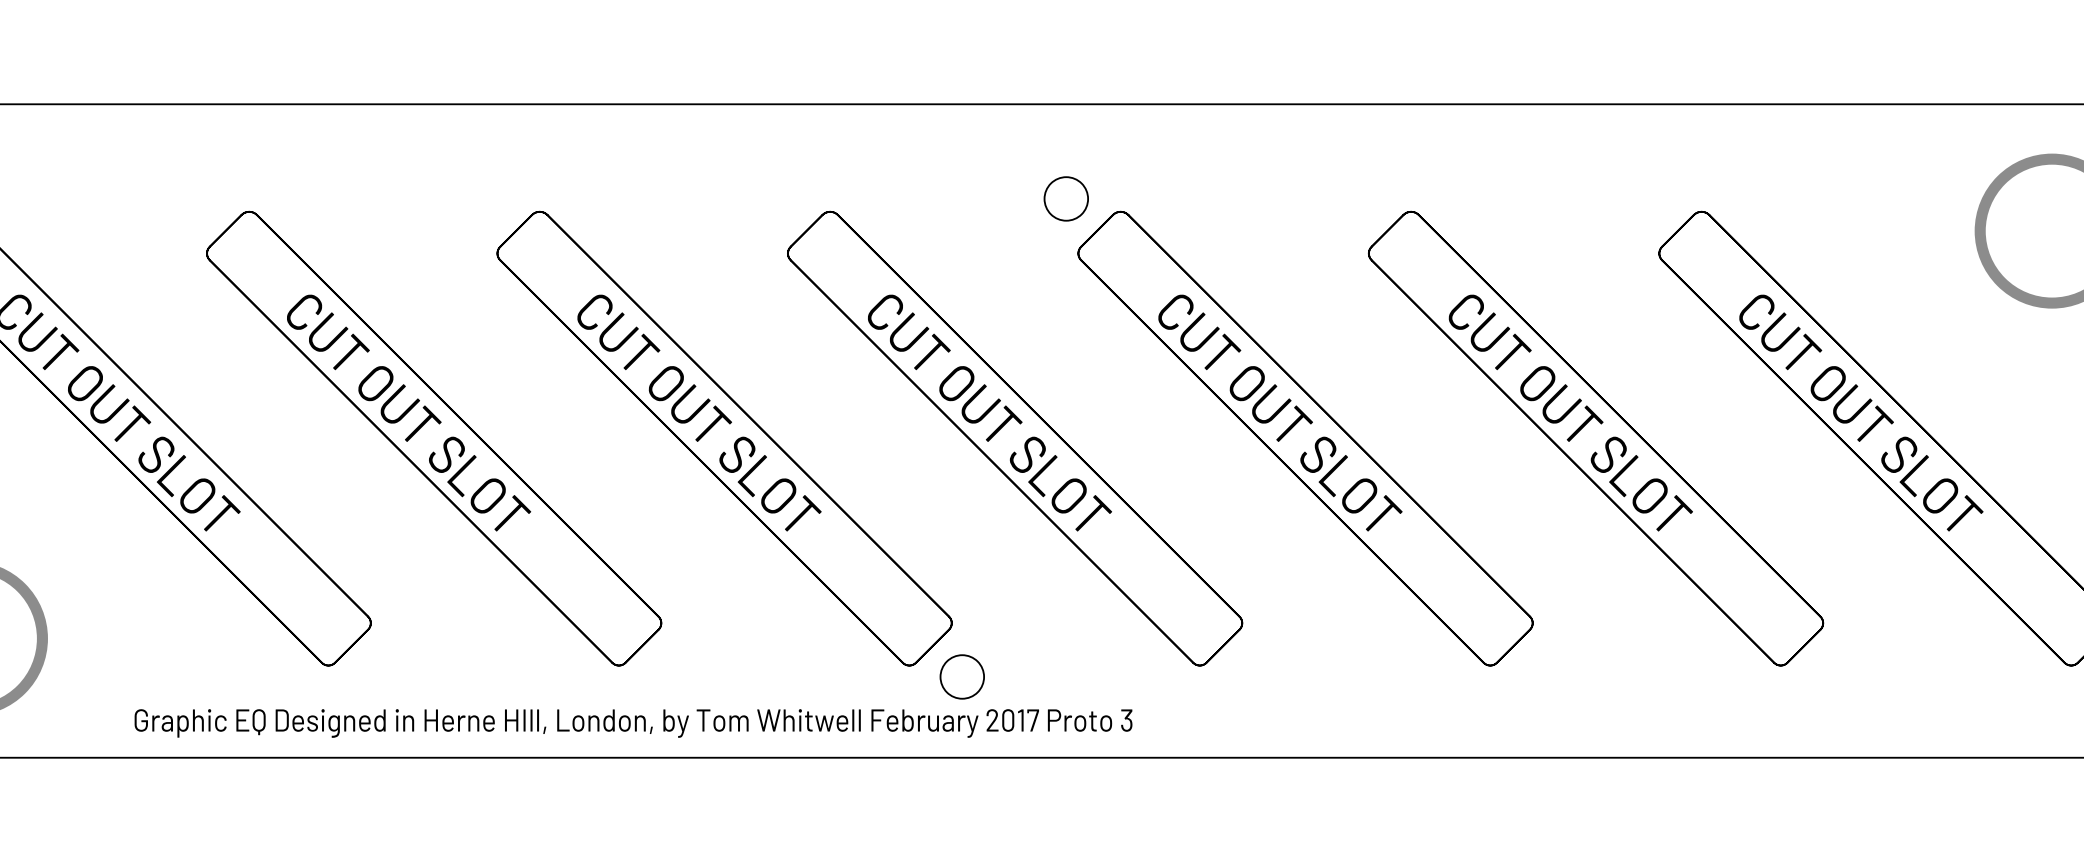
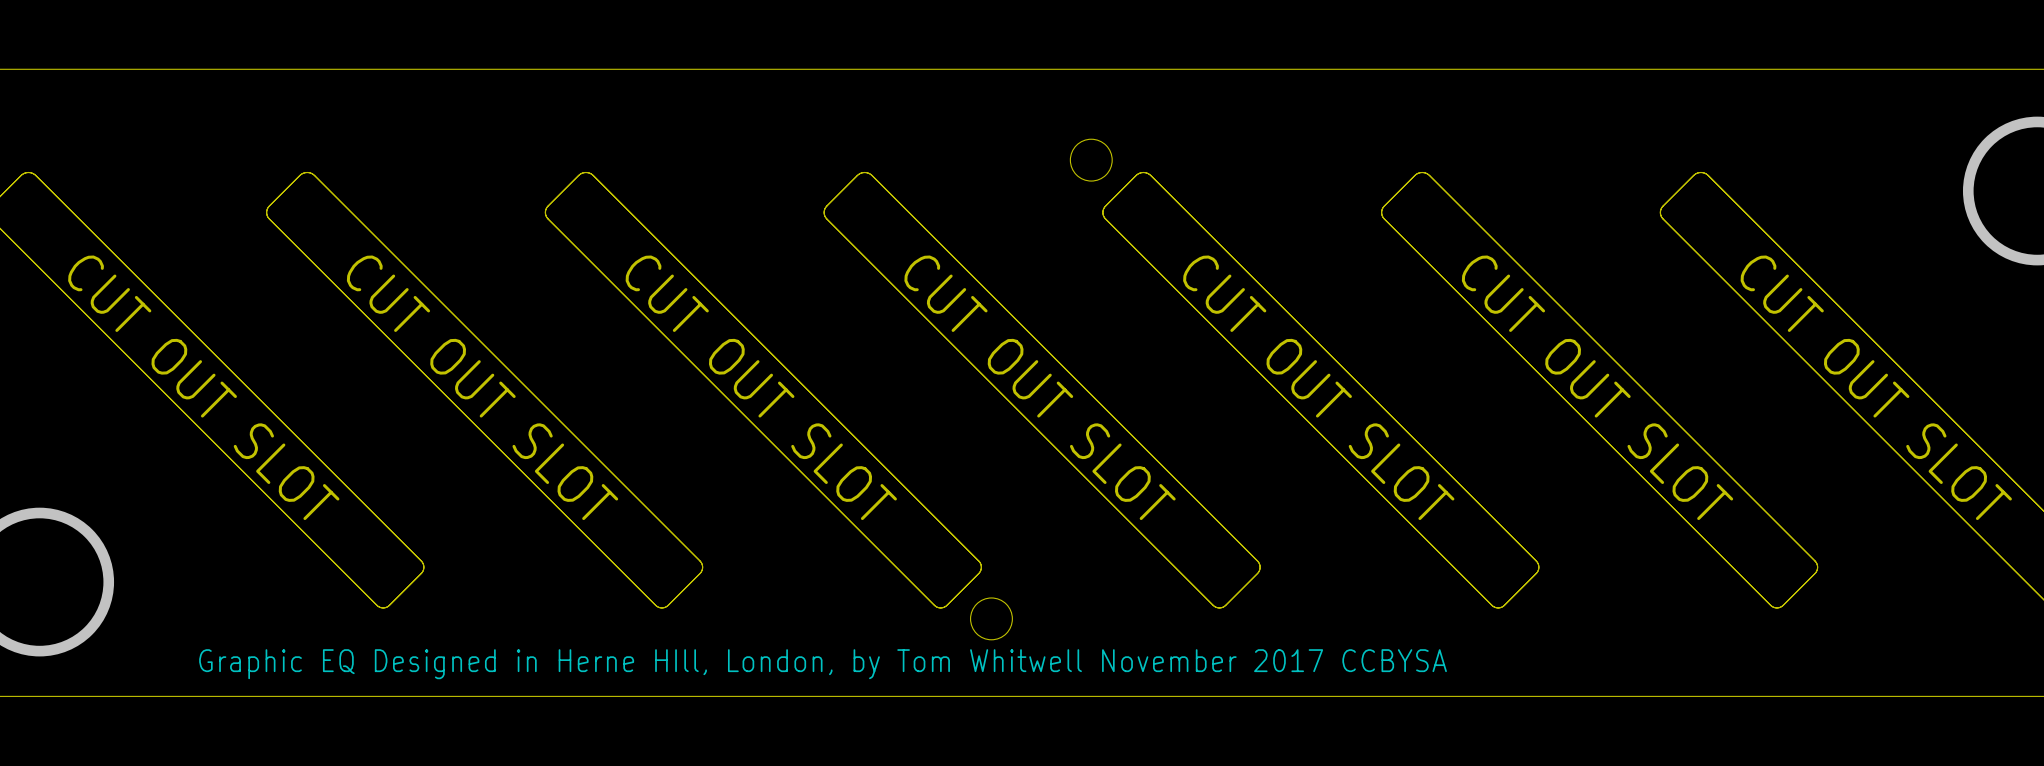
text: Graphic EQ Designed in Herne HIll, London, by Tom Whitwell February 2017 Proto 3 (633, 723) -> Graphic EQ Designed in Herne HIll, London, by Tom Whitwell November 2017 CCBYSA (823, 664)

